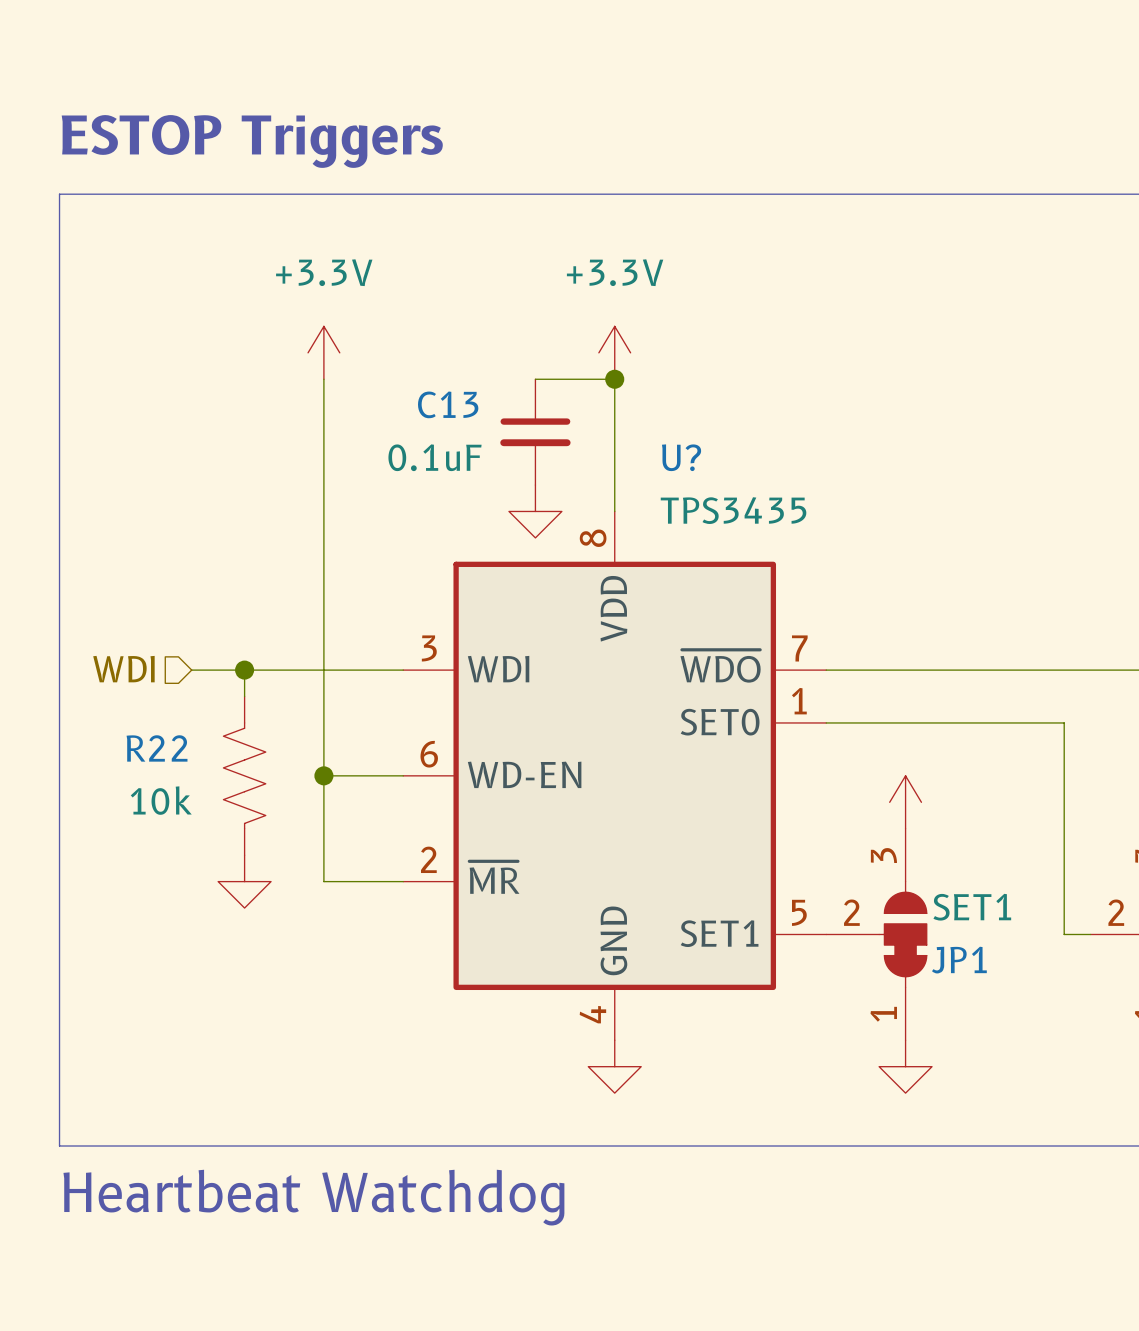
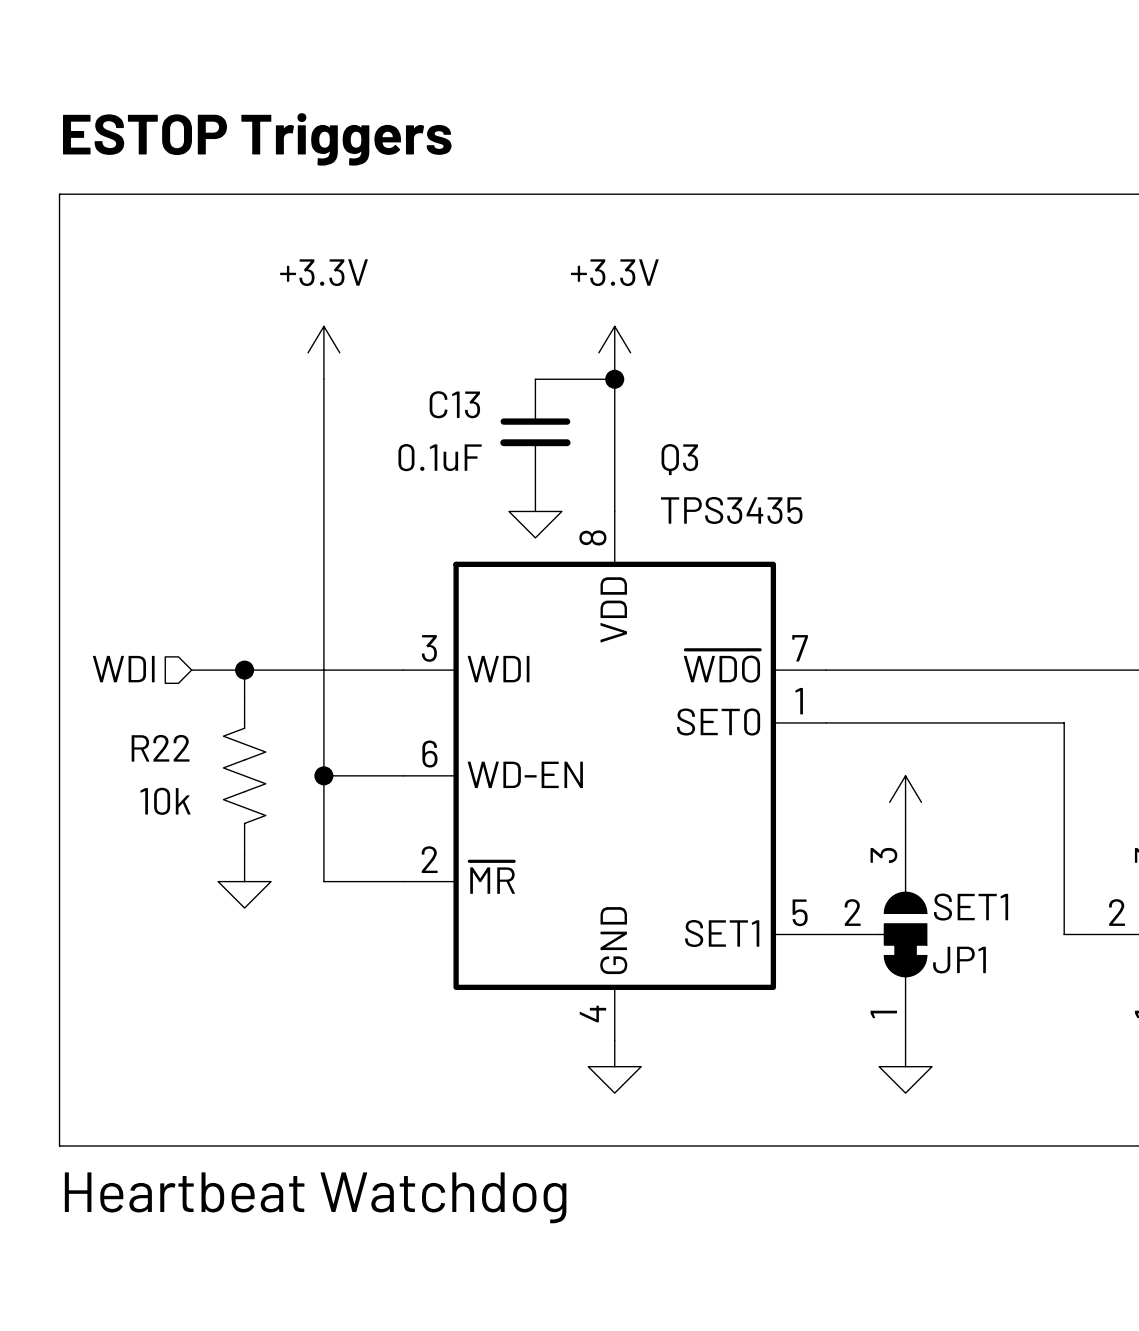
U? name: U? (681, 457) -> Q3 (679, 459)

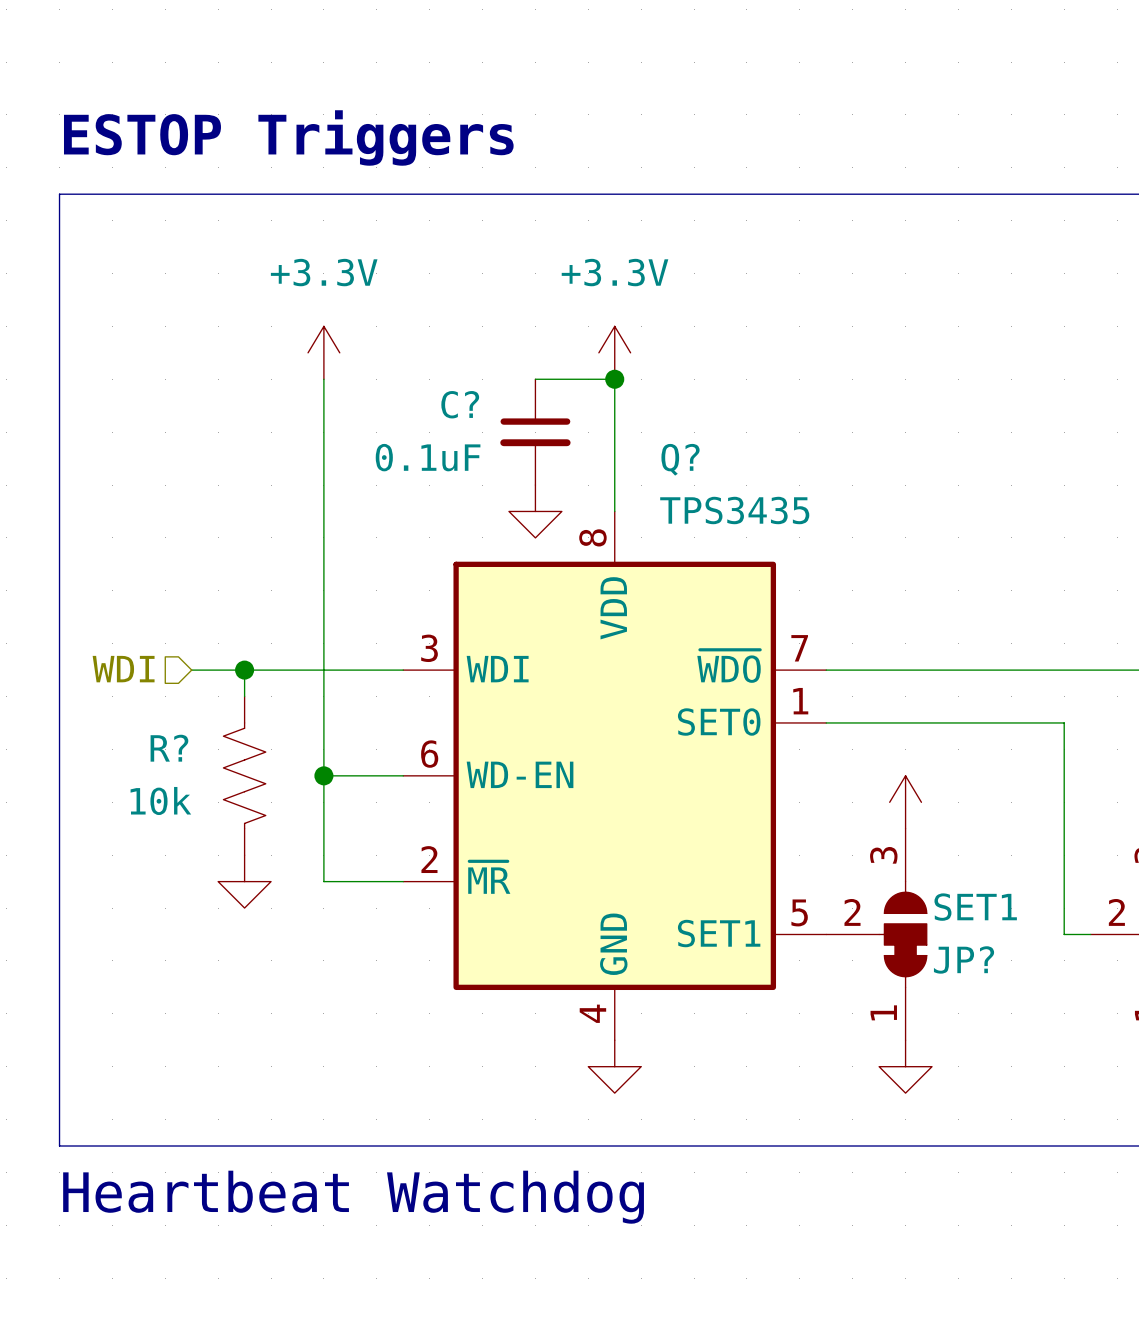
C13 name: C13 (454, 404) -> C? (460, 404)
Q3 name: Q3 (679, 459) -> Q? (680, 459)
R22 name: R22 (160, 748) -> R? (169, 748)
JP1 name: JP1 (959, 960) -> JP? (964, 959)

